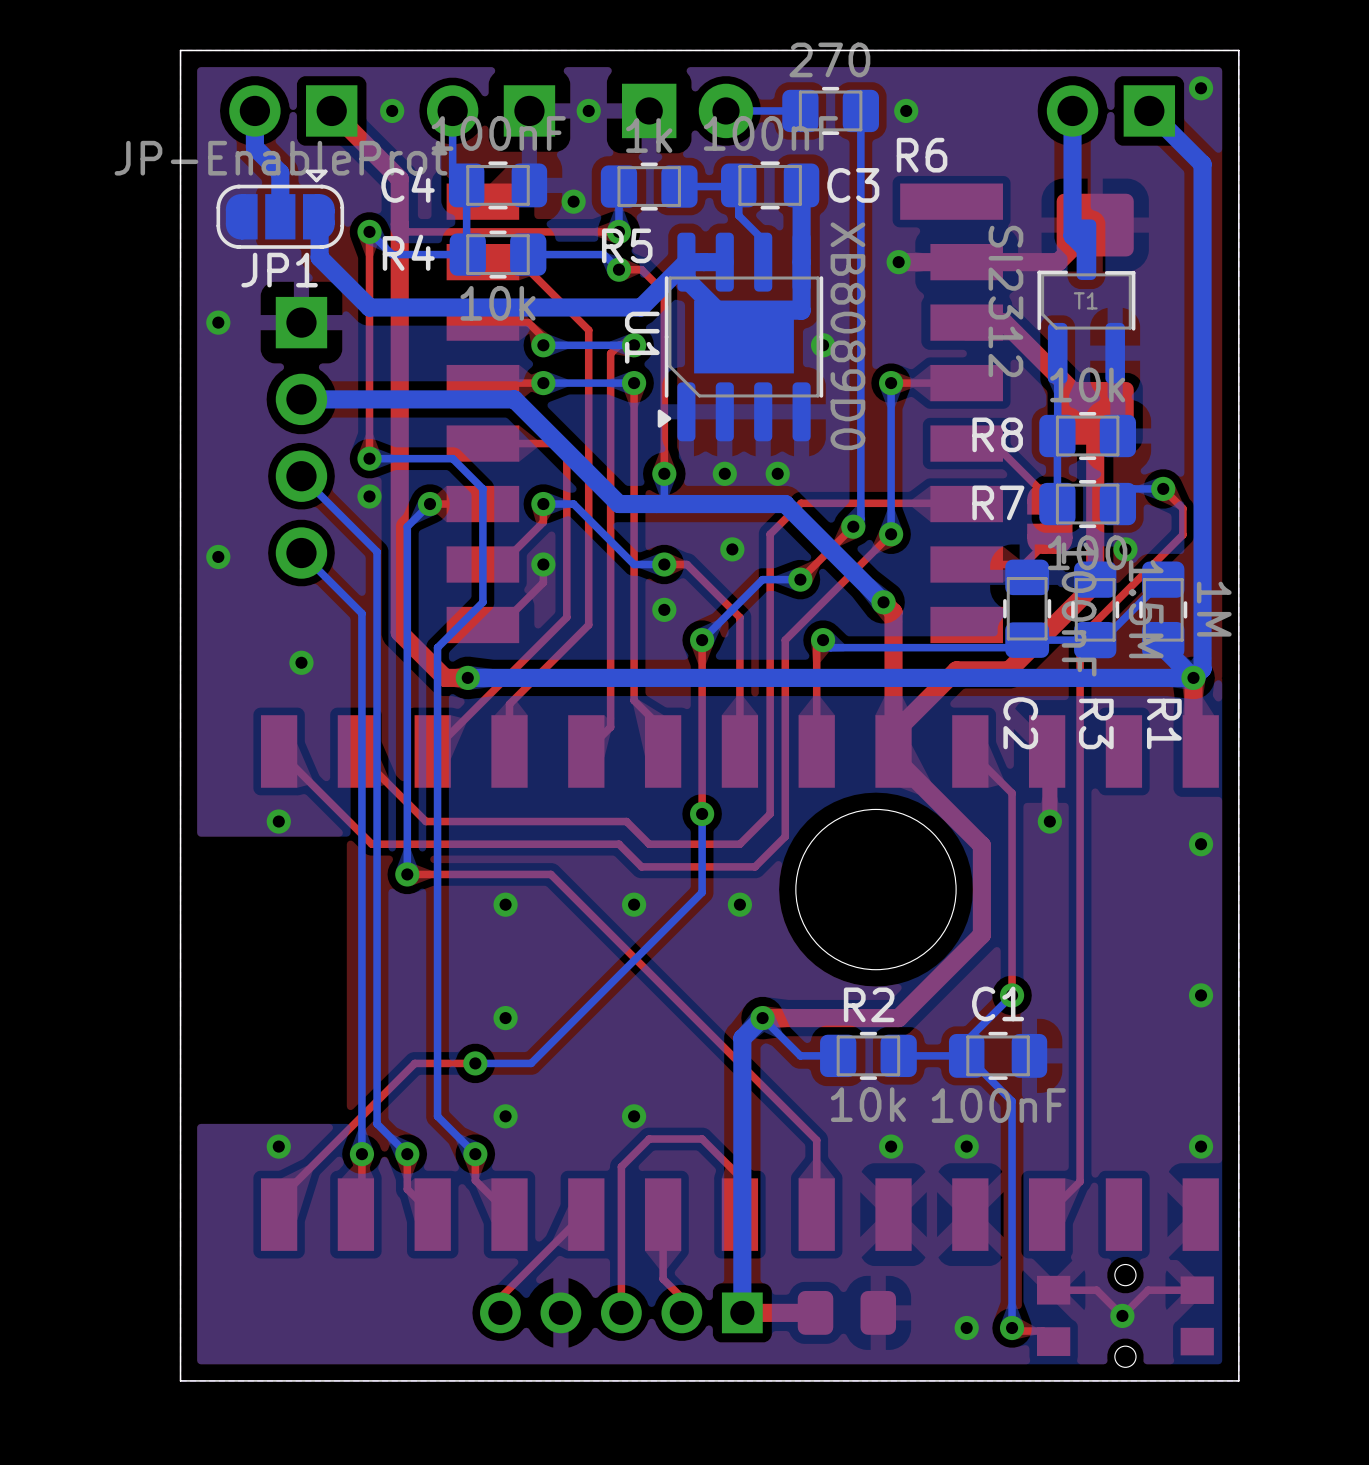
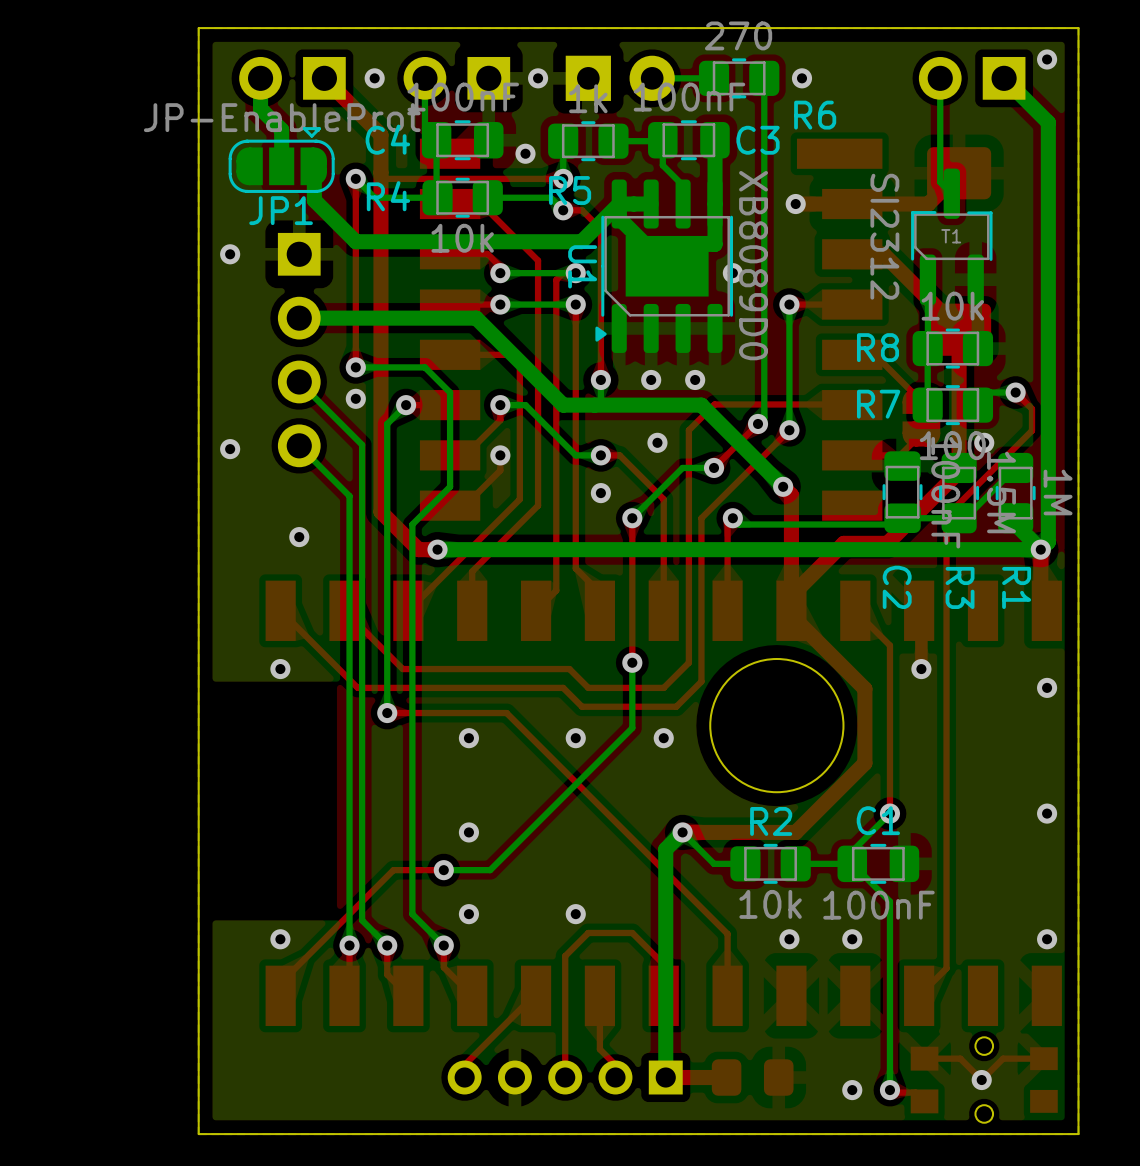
bottom track width: thick (1072, 118) (1072, 235) (1086, 249) -> thin (940, 84) (940, 182) (951, 193)

